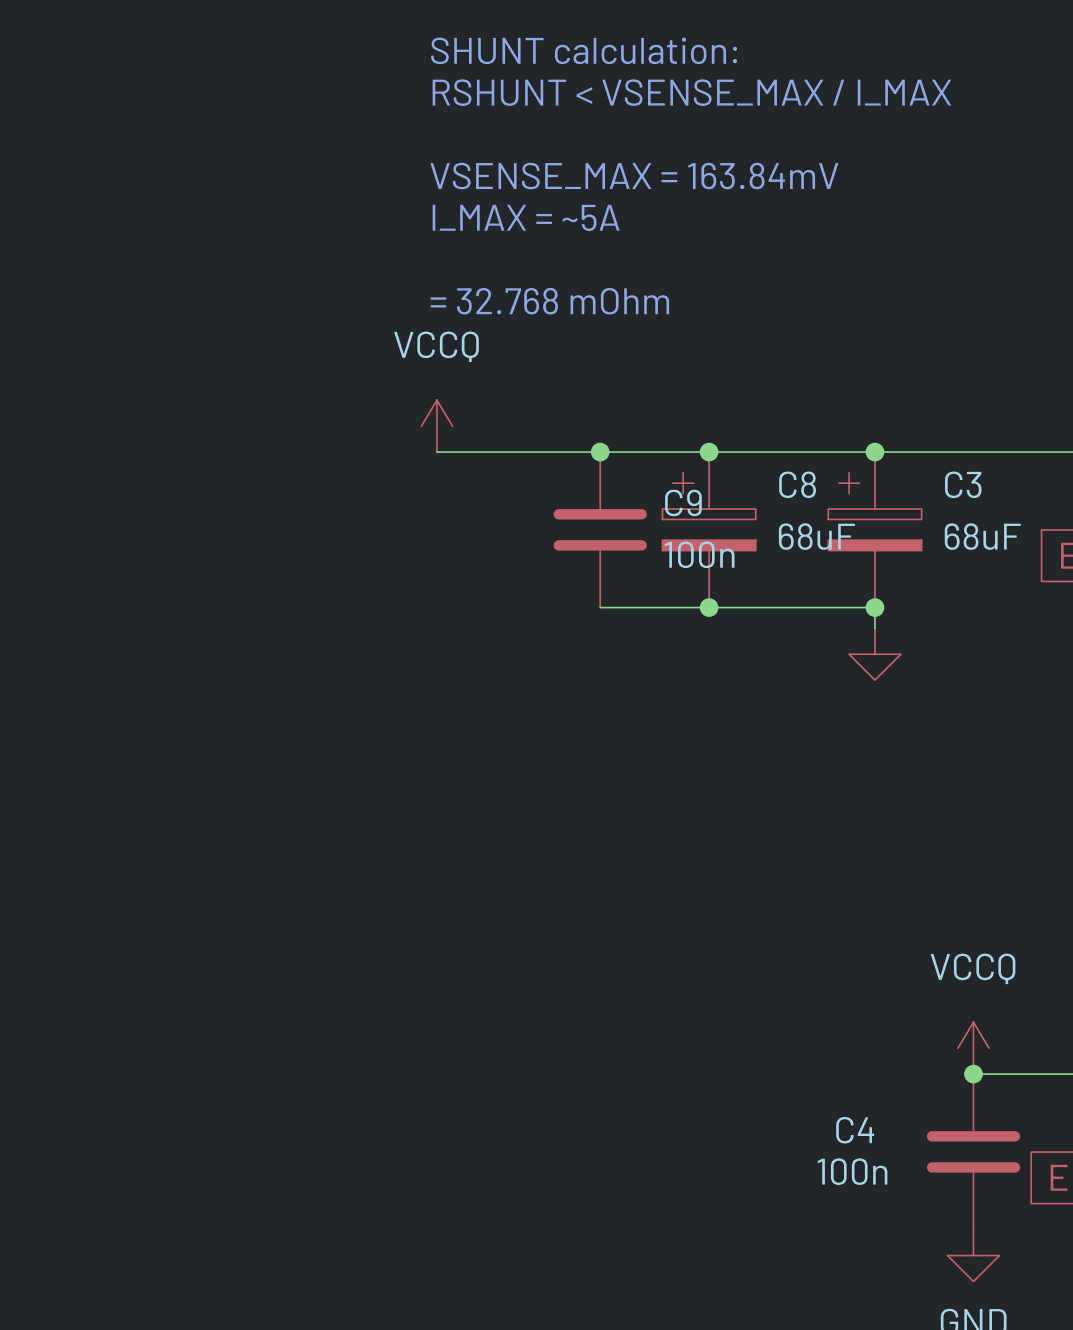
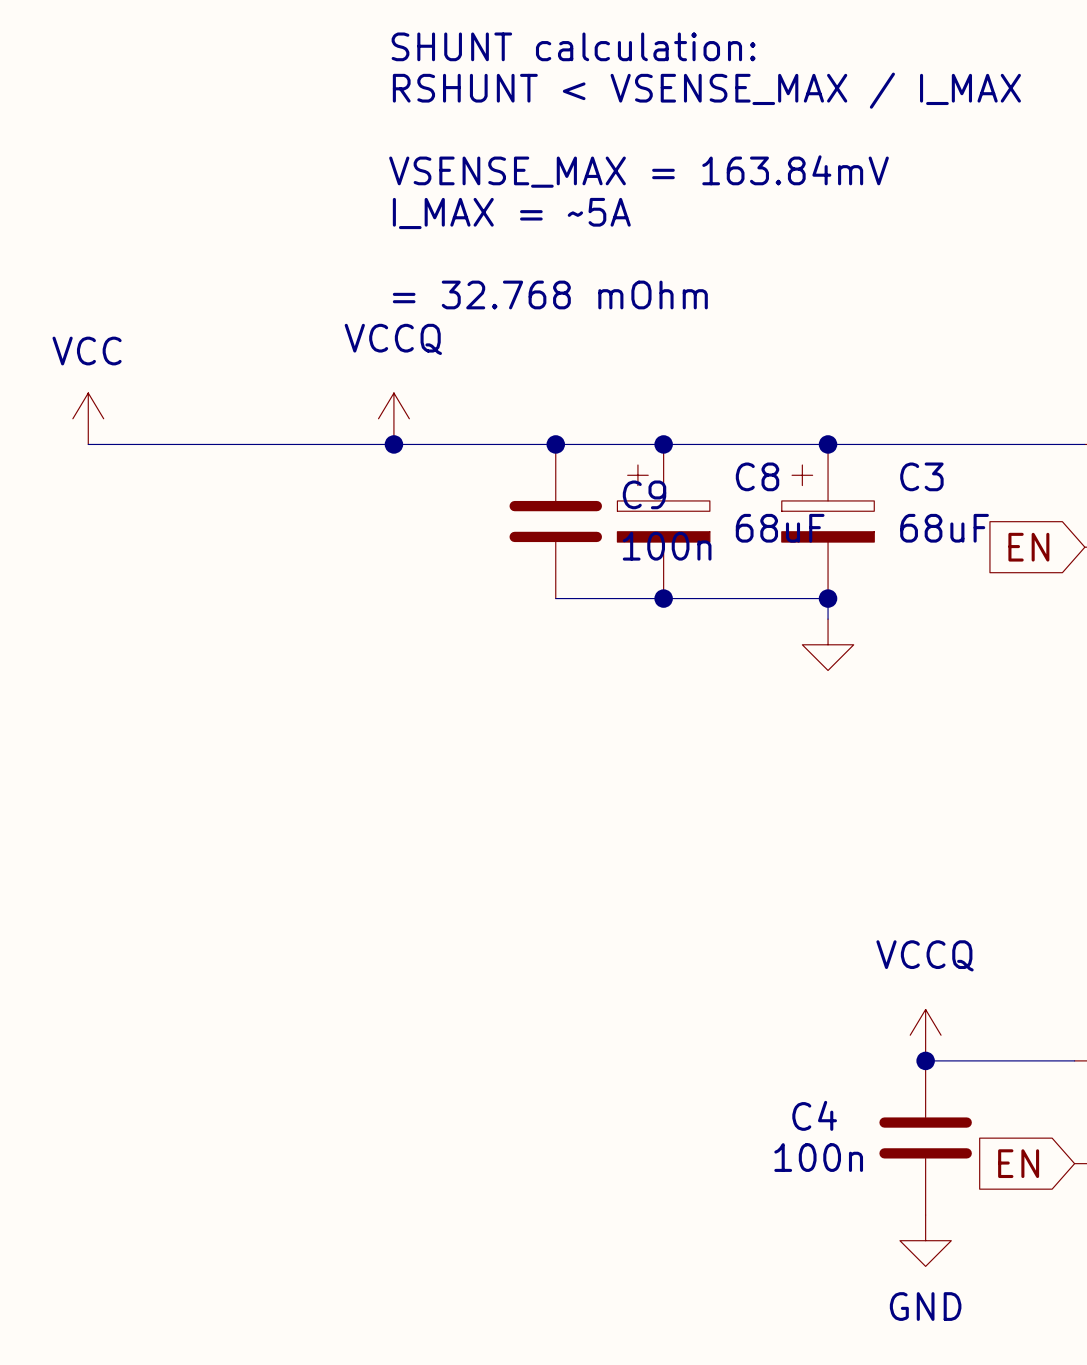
power symbol: none -> VCC (88, 418)
wire: none -> (88, 444) (393, 444)
junction: none -> (393, 444)

